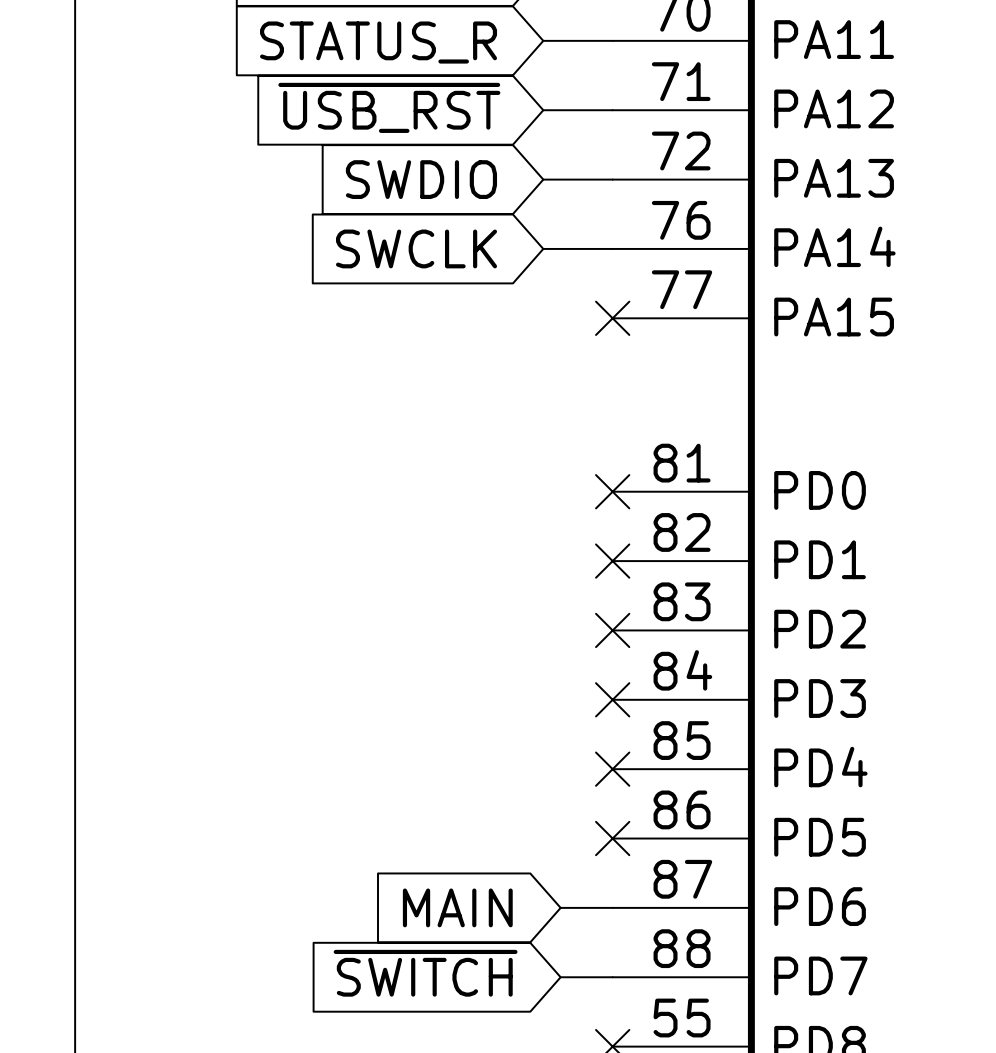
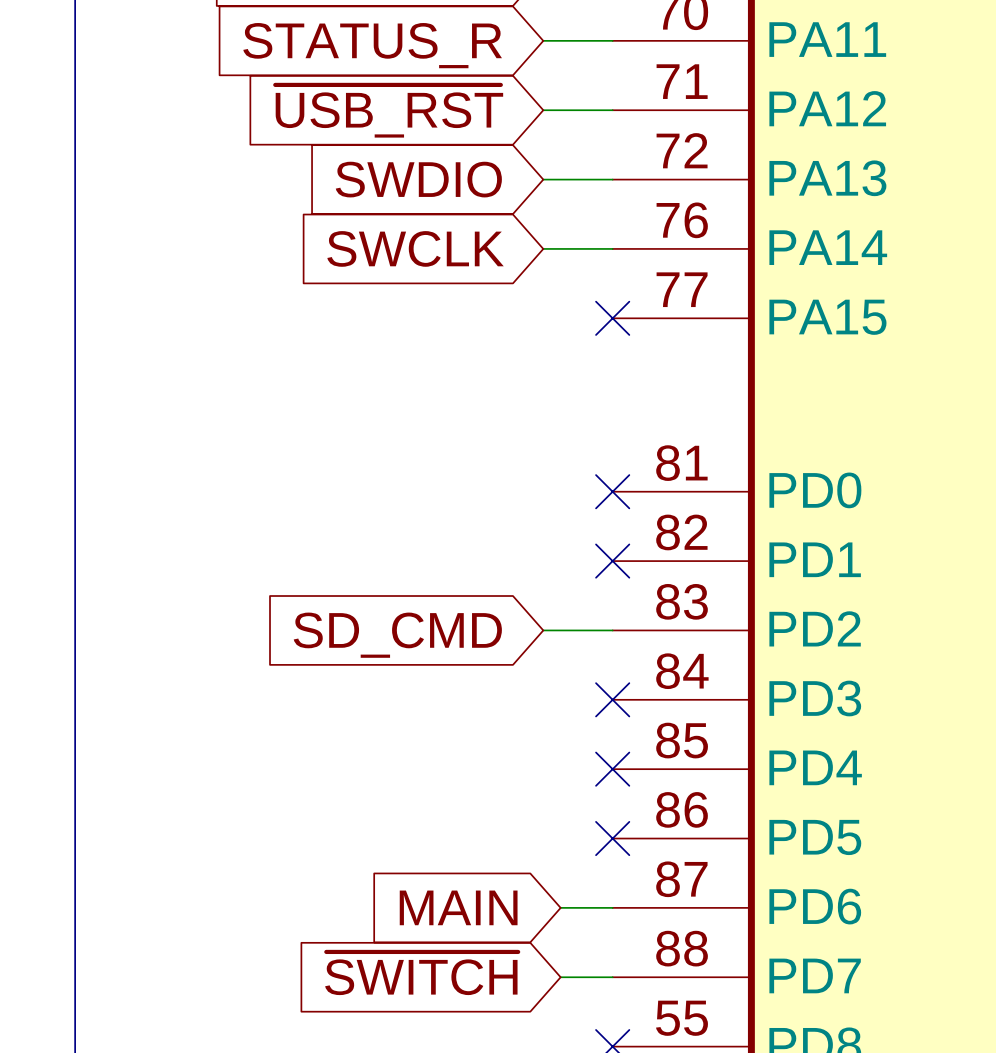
wire: none -> (543, 630) (612, 630)
no-connect mark: (612, 630) -> none
global label: none -> SD_CMD (397, 635)

